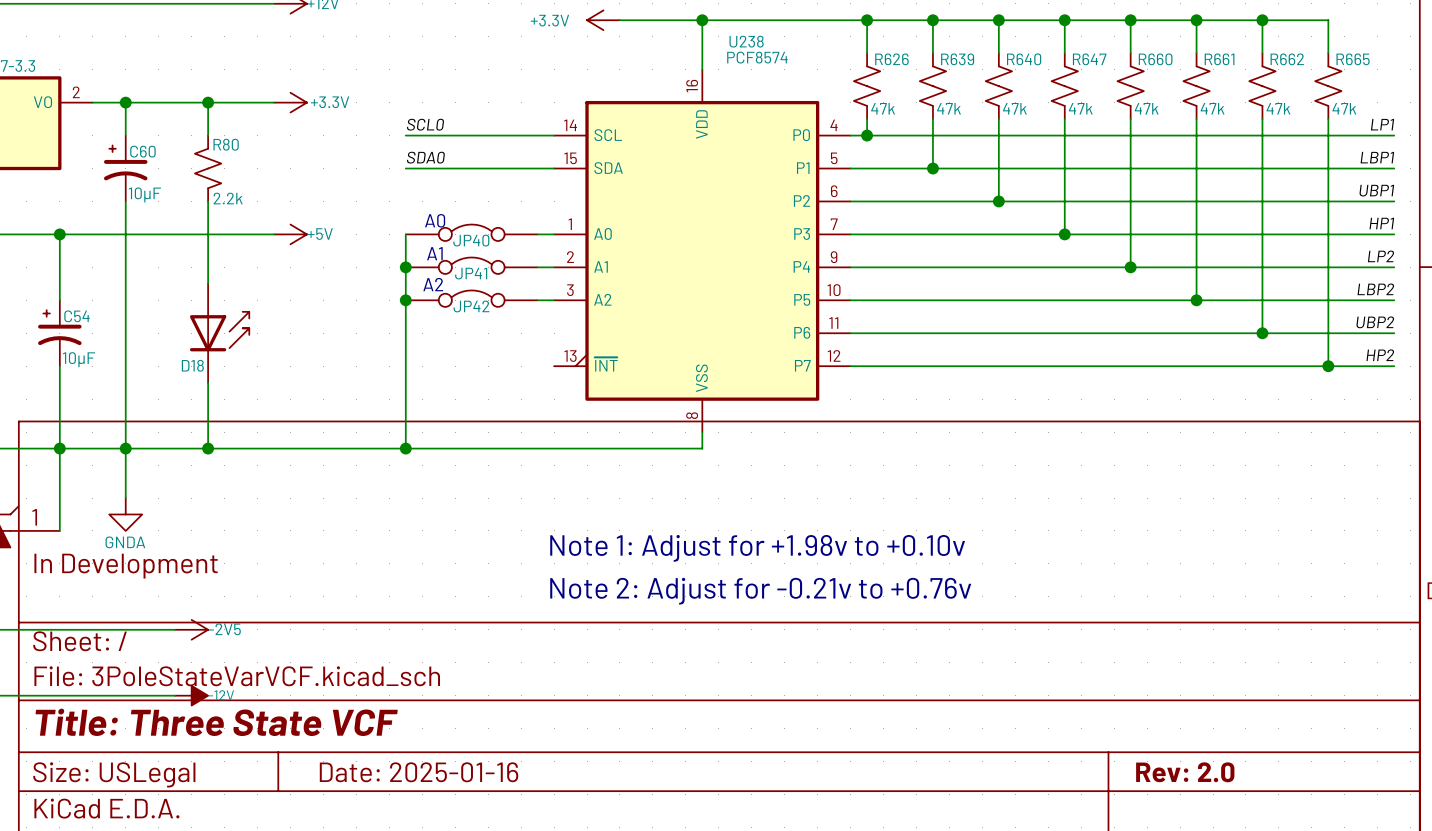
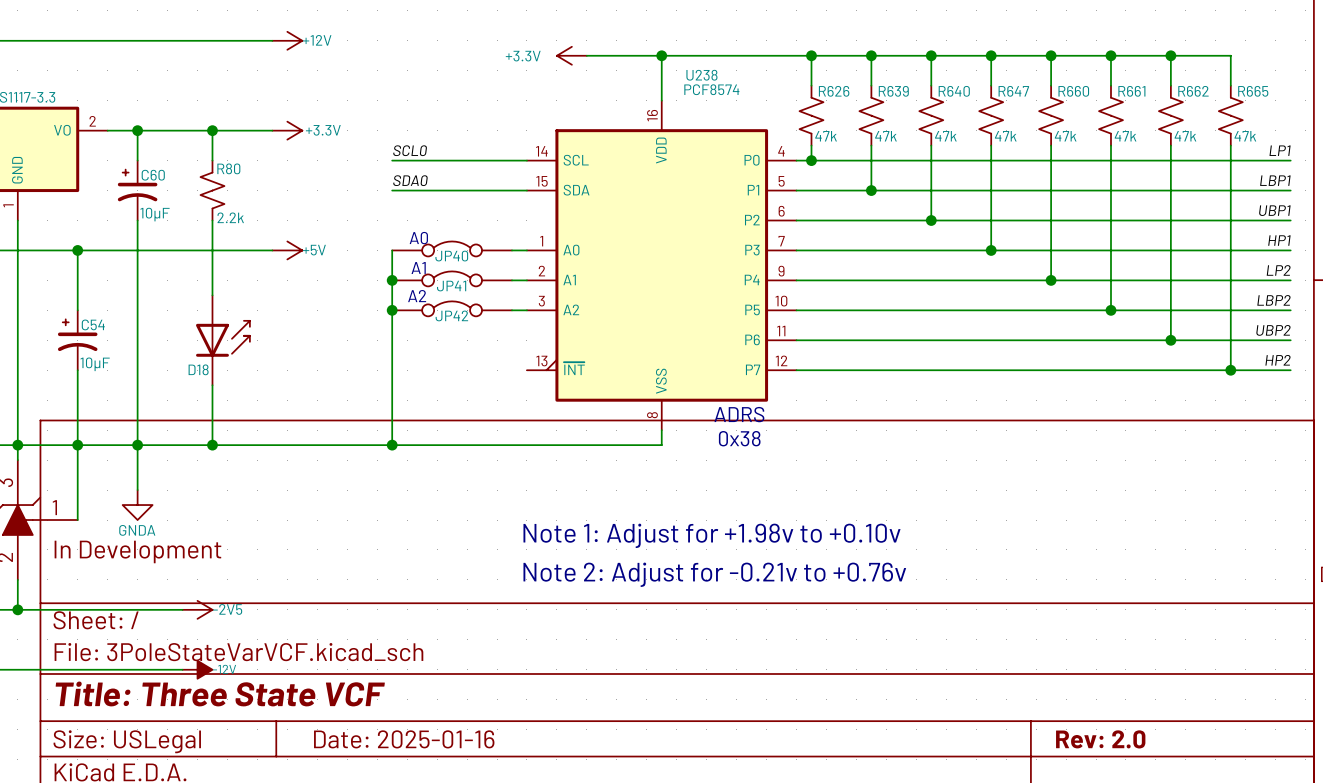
text: none -> ADRS (739, 414)
text: none -> 0x38 (739, 438)

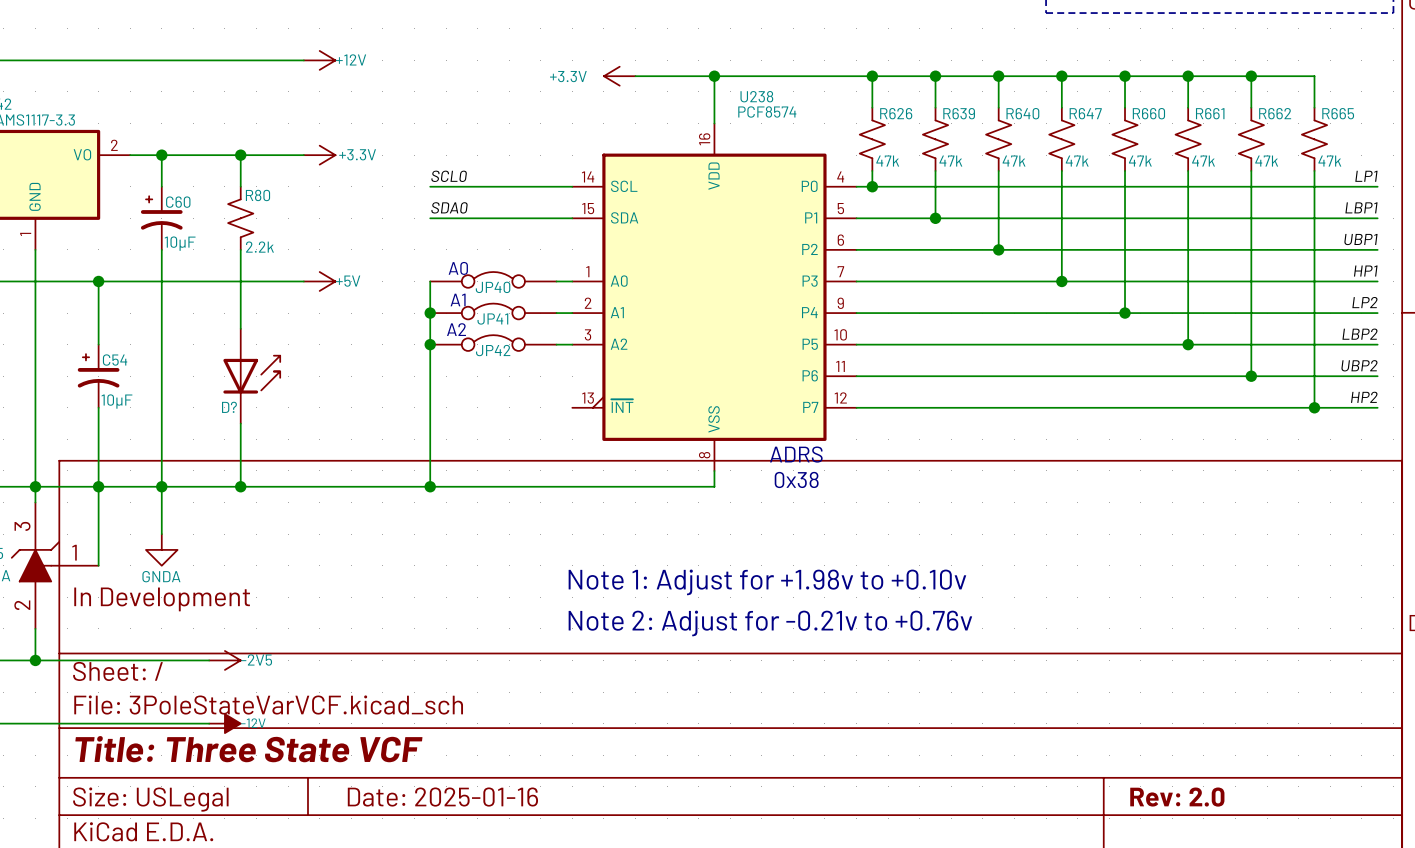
D18 name: D18 (198, 369) -> D? (229, 407)

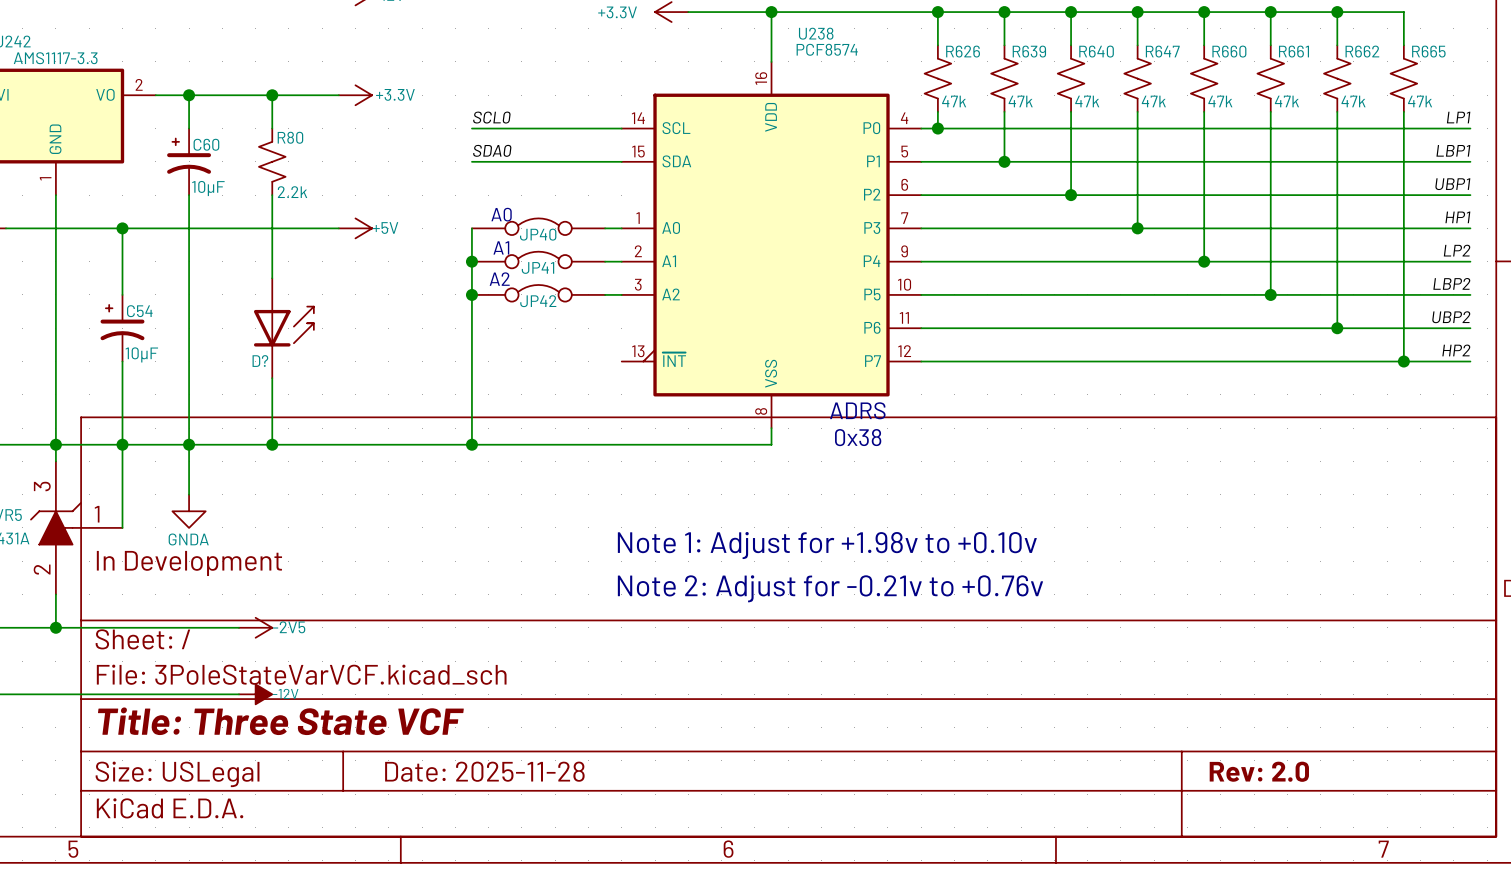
title block: Date: 2025-01-16 (442, 797) -> Date: 2025-11-28 (484, 771)

